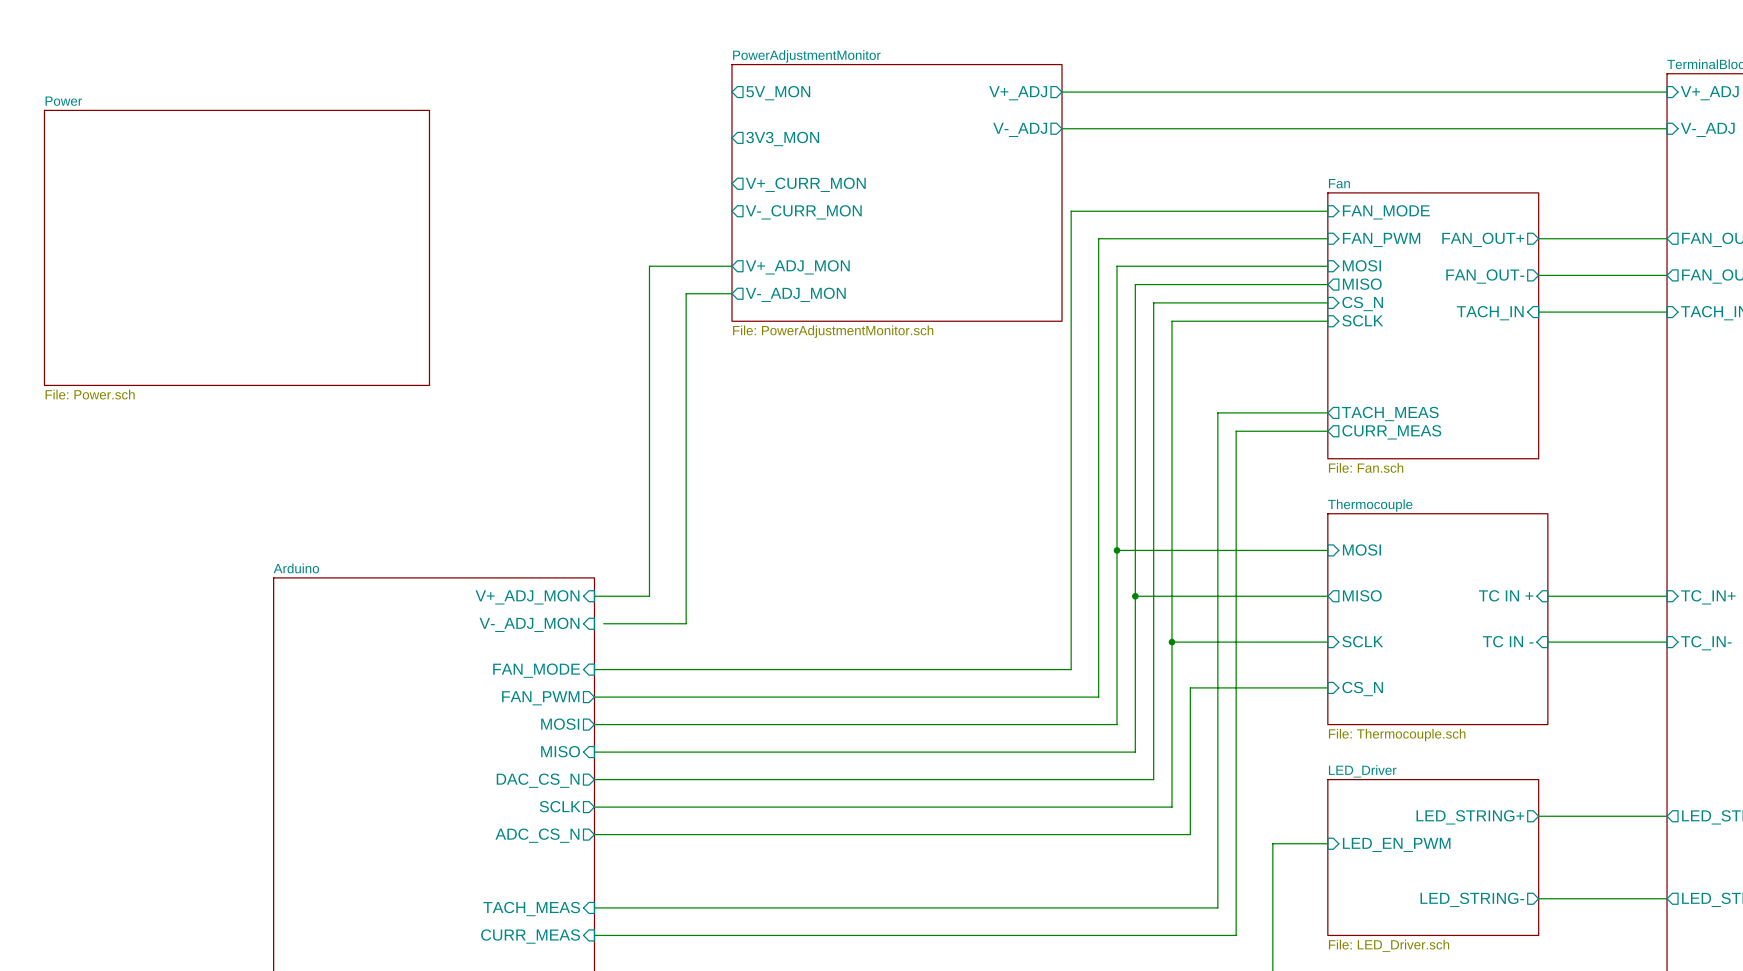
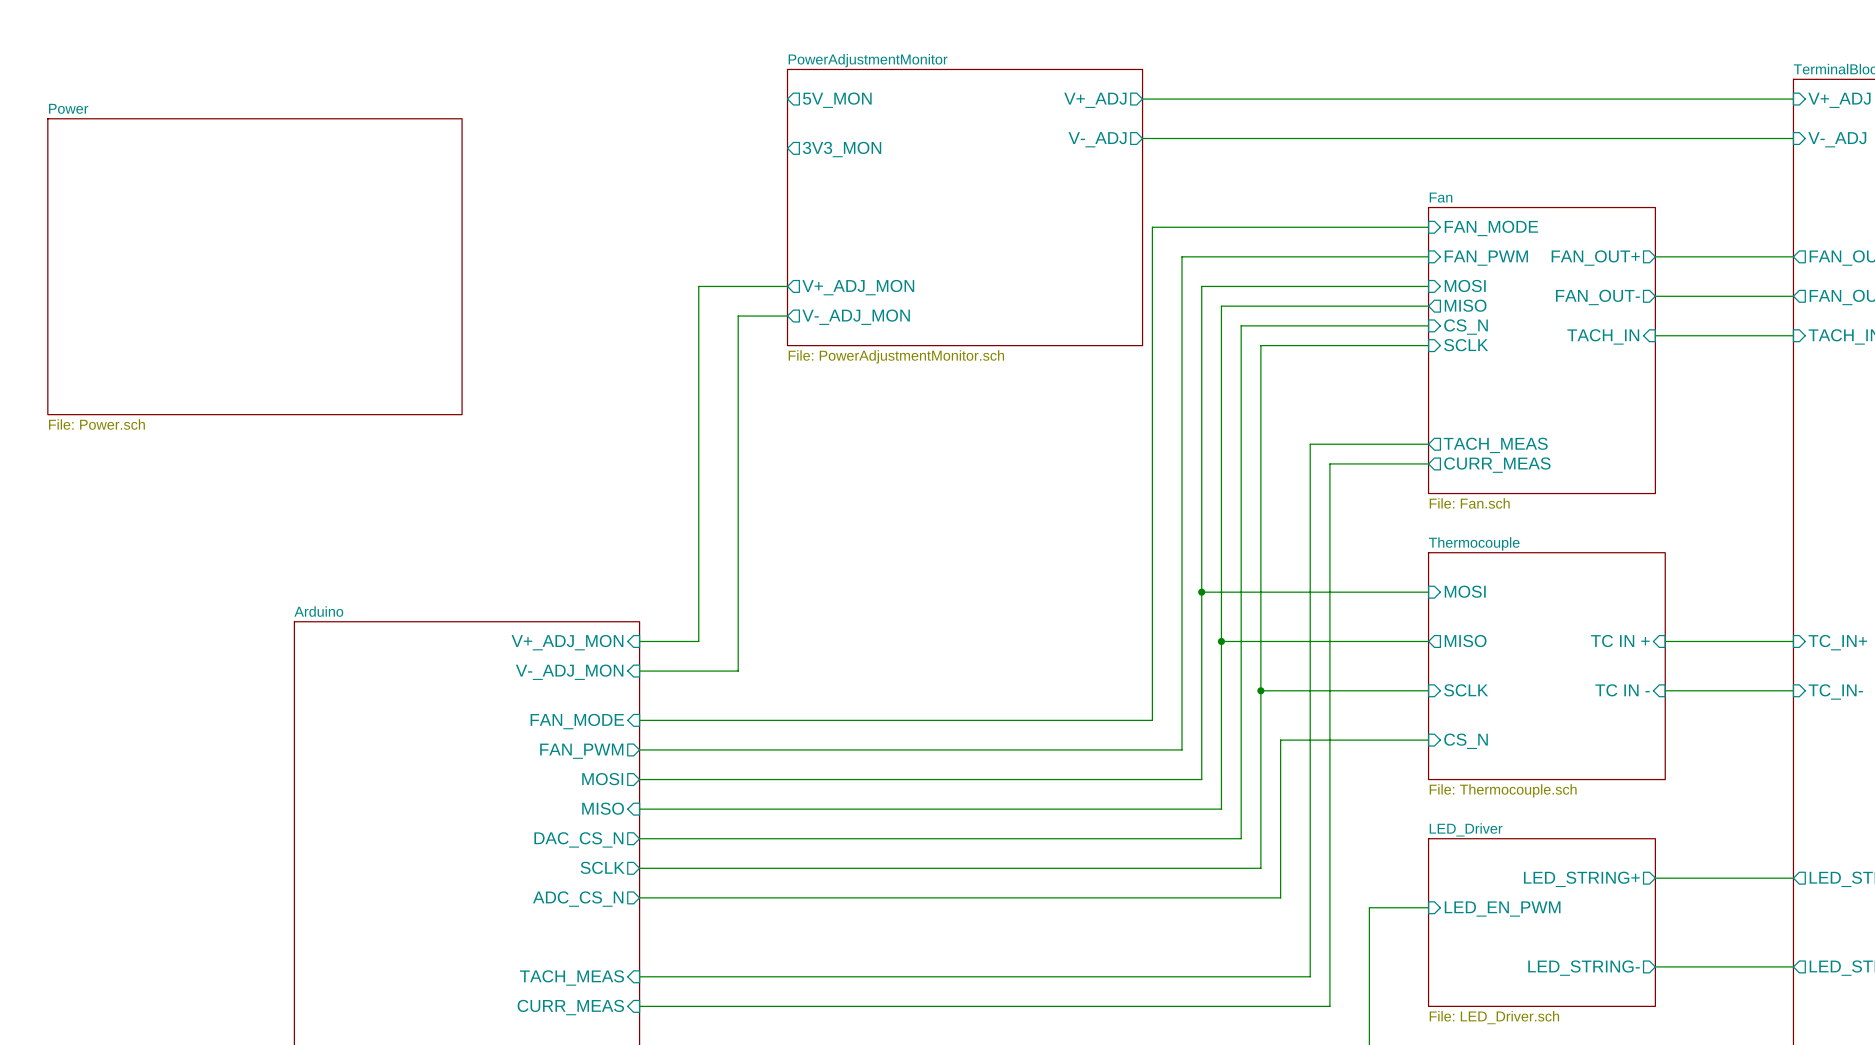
sheet pin: V+_CURR_MON (805, 184) -> none
sheet pin: V-_CURR_MON (803, 212) -> none
wire: none -> (639, 671) (649, 671)

